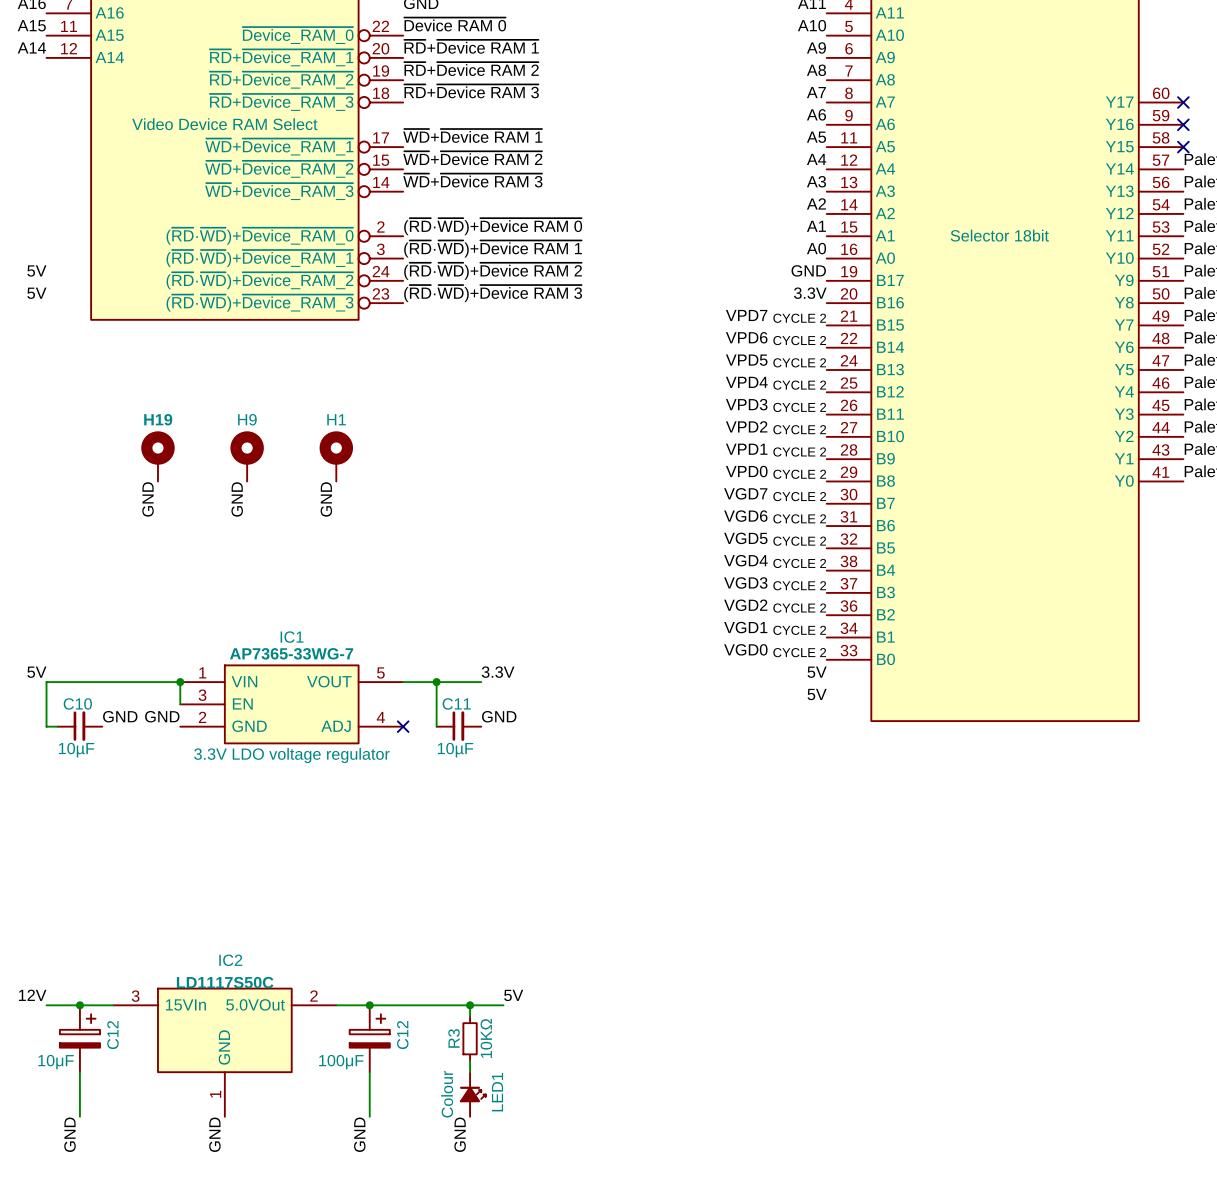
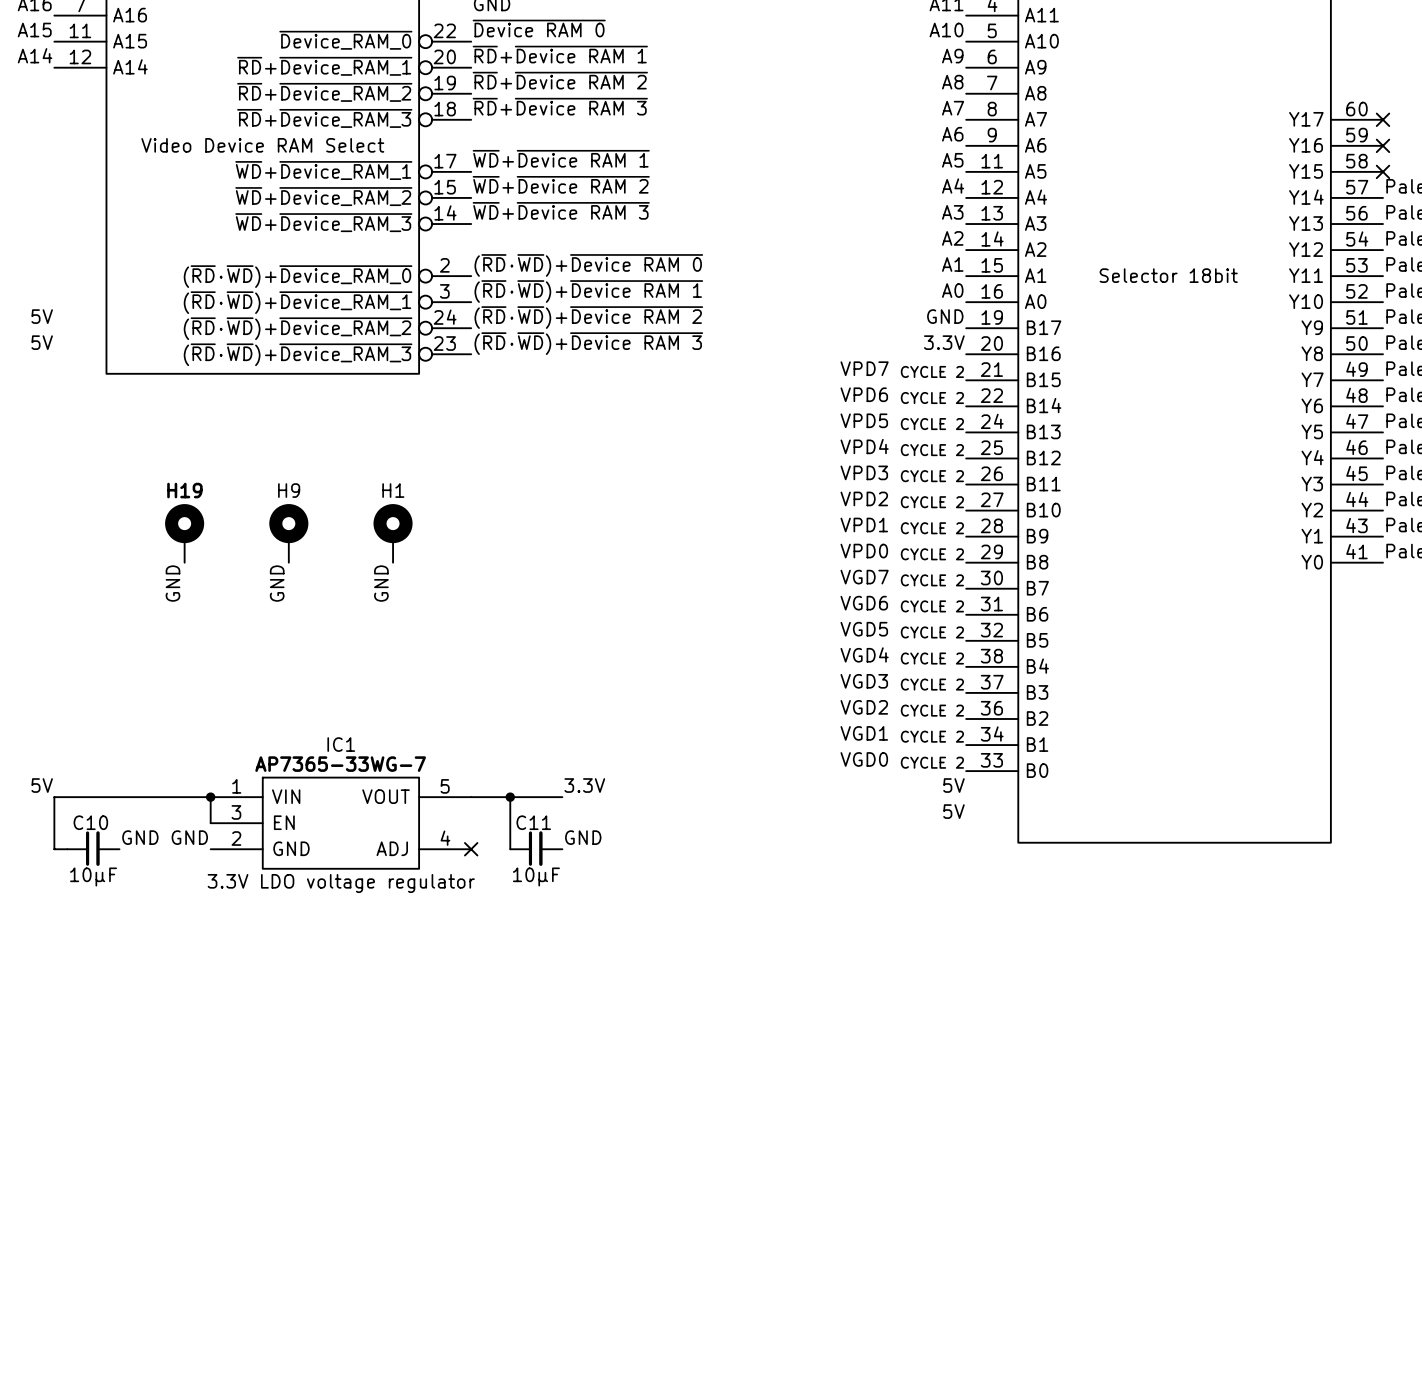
label: 12V (32, 995) -> none
label: 5V (513, 995) -> none
wire: (46, 1005) (113, 1005) -> none
junction: (79, 1005) -> none
wire: (336, 1005) (503, 1005) -> none
junction: (369, 1005) -> none
wire: (470, 1005) (470, 1016) -> none
junction: (470, 1005) -> none
C12: (79, 1038) -> none
C12: (369, 1038) -> none
R3: 10KΩ (470, 1038) -> none
IC2: LD1117S50C (224, 1052) -> none
wire: (470, 1061) (470, 1072) -> none
wire: (79, 1072) (79, 1116) -> none
wire: (369, 1072) (369, 1116) -> none
LED1: (472, 1094) -> none
label: GND (70, 1134) -> none
label: GND (214, 1134) -> none
label: GND (359, 1134) -> none
label: GND (460, 1134) -> none

